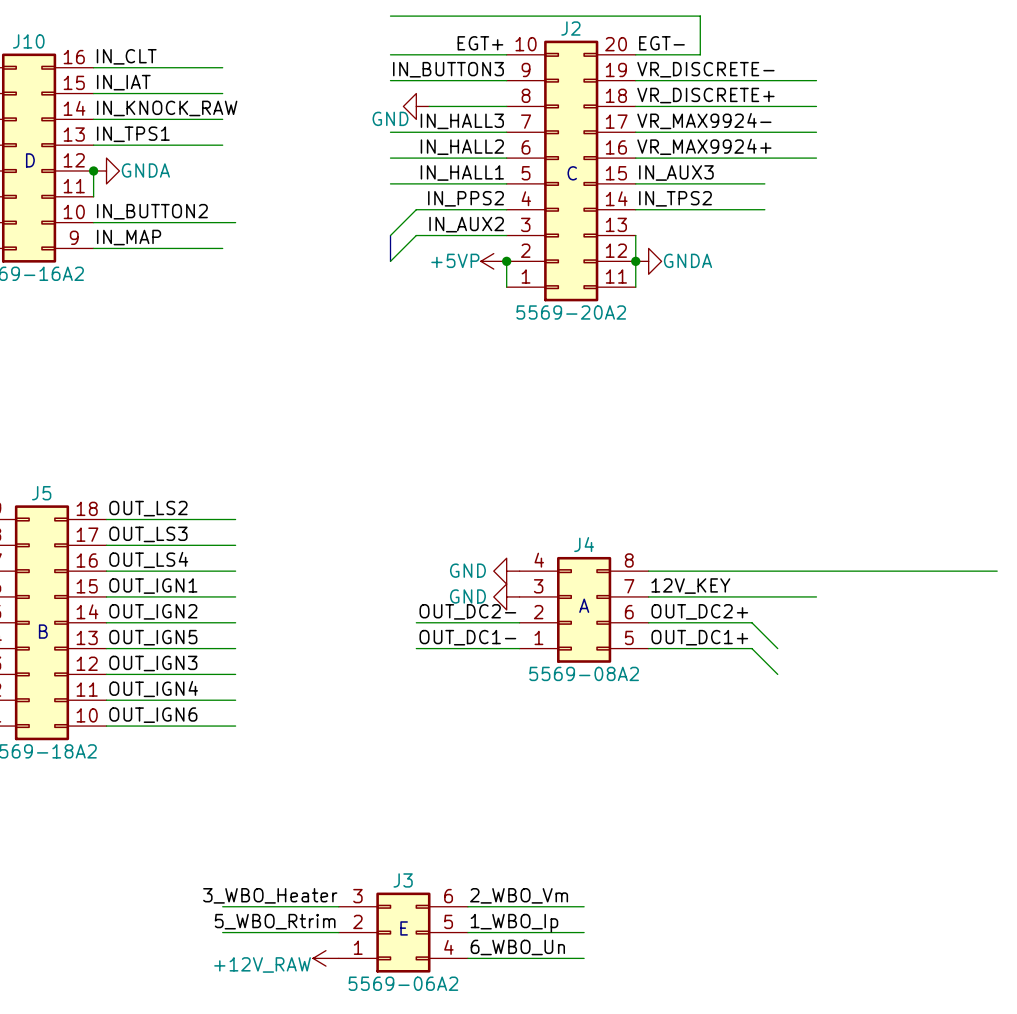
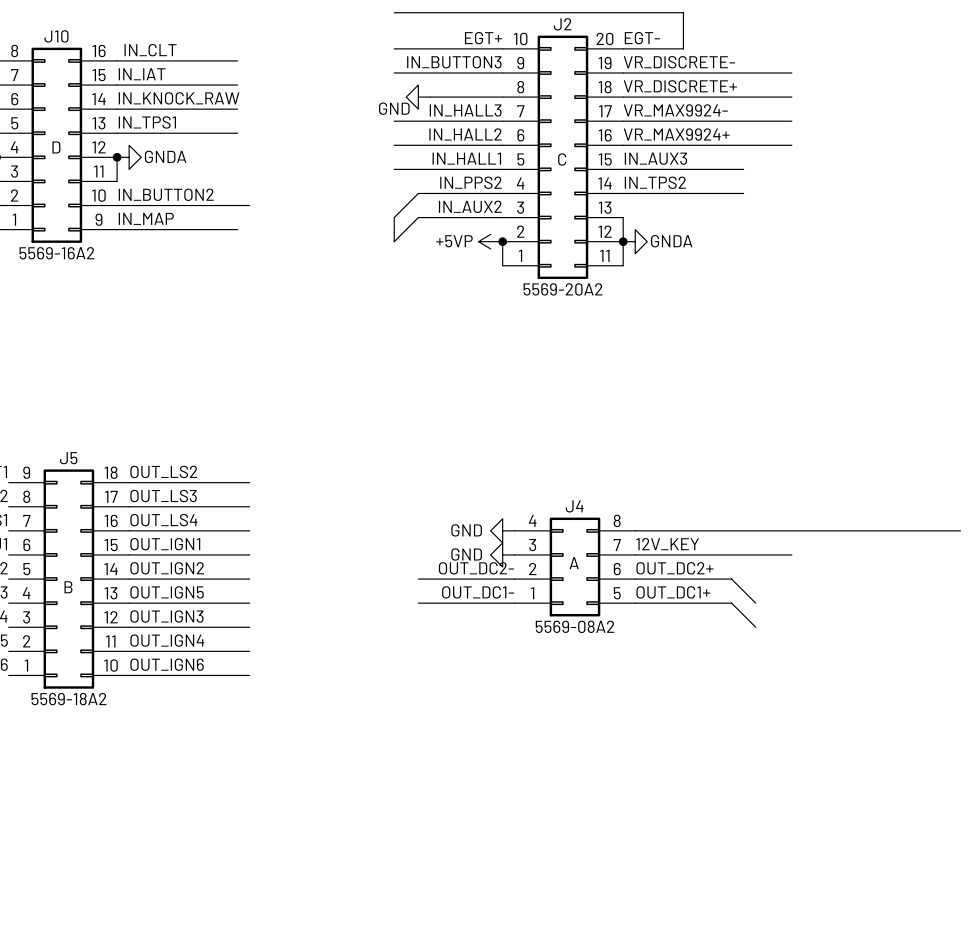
label: 3_WBO_Heater (270, 895) -> none
label: 2_WBO_Vm (519, 895) -> none
wire: (222, 906) (338, 906) -> none
wire: (467, 906) (584, 906) -> none
label: 5_WBO_Rtrim (275, 921) -> none
label: 1_WBO_Ip (514, 923) -> none
text: E (404, 928) -> none
wire: (222, 932) (338, 932) -> none
J3: 5569-06A2 (403, 932) -> none
wire: (467, 932) (584, 932) -> none
label: 6_WBO_Un (517, 947) -> none
power symbol: +12V_RAW (325, 958) -> none
wire: (467, 958) (584, 958) -> none

